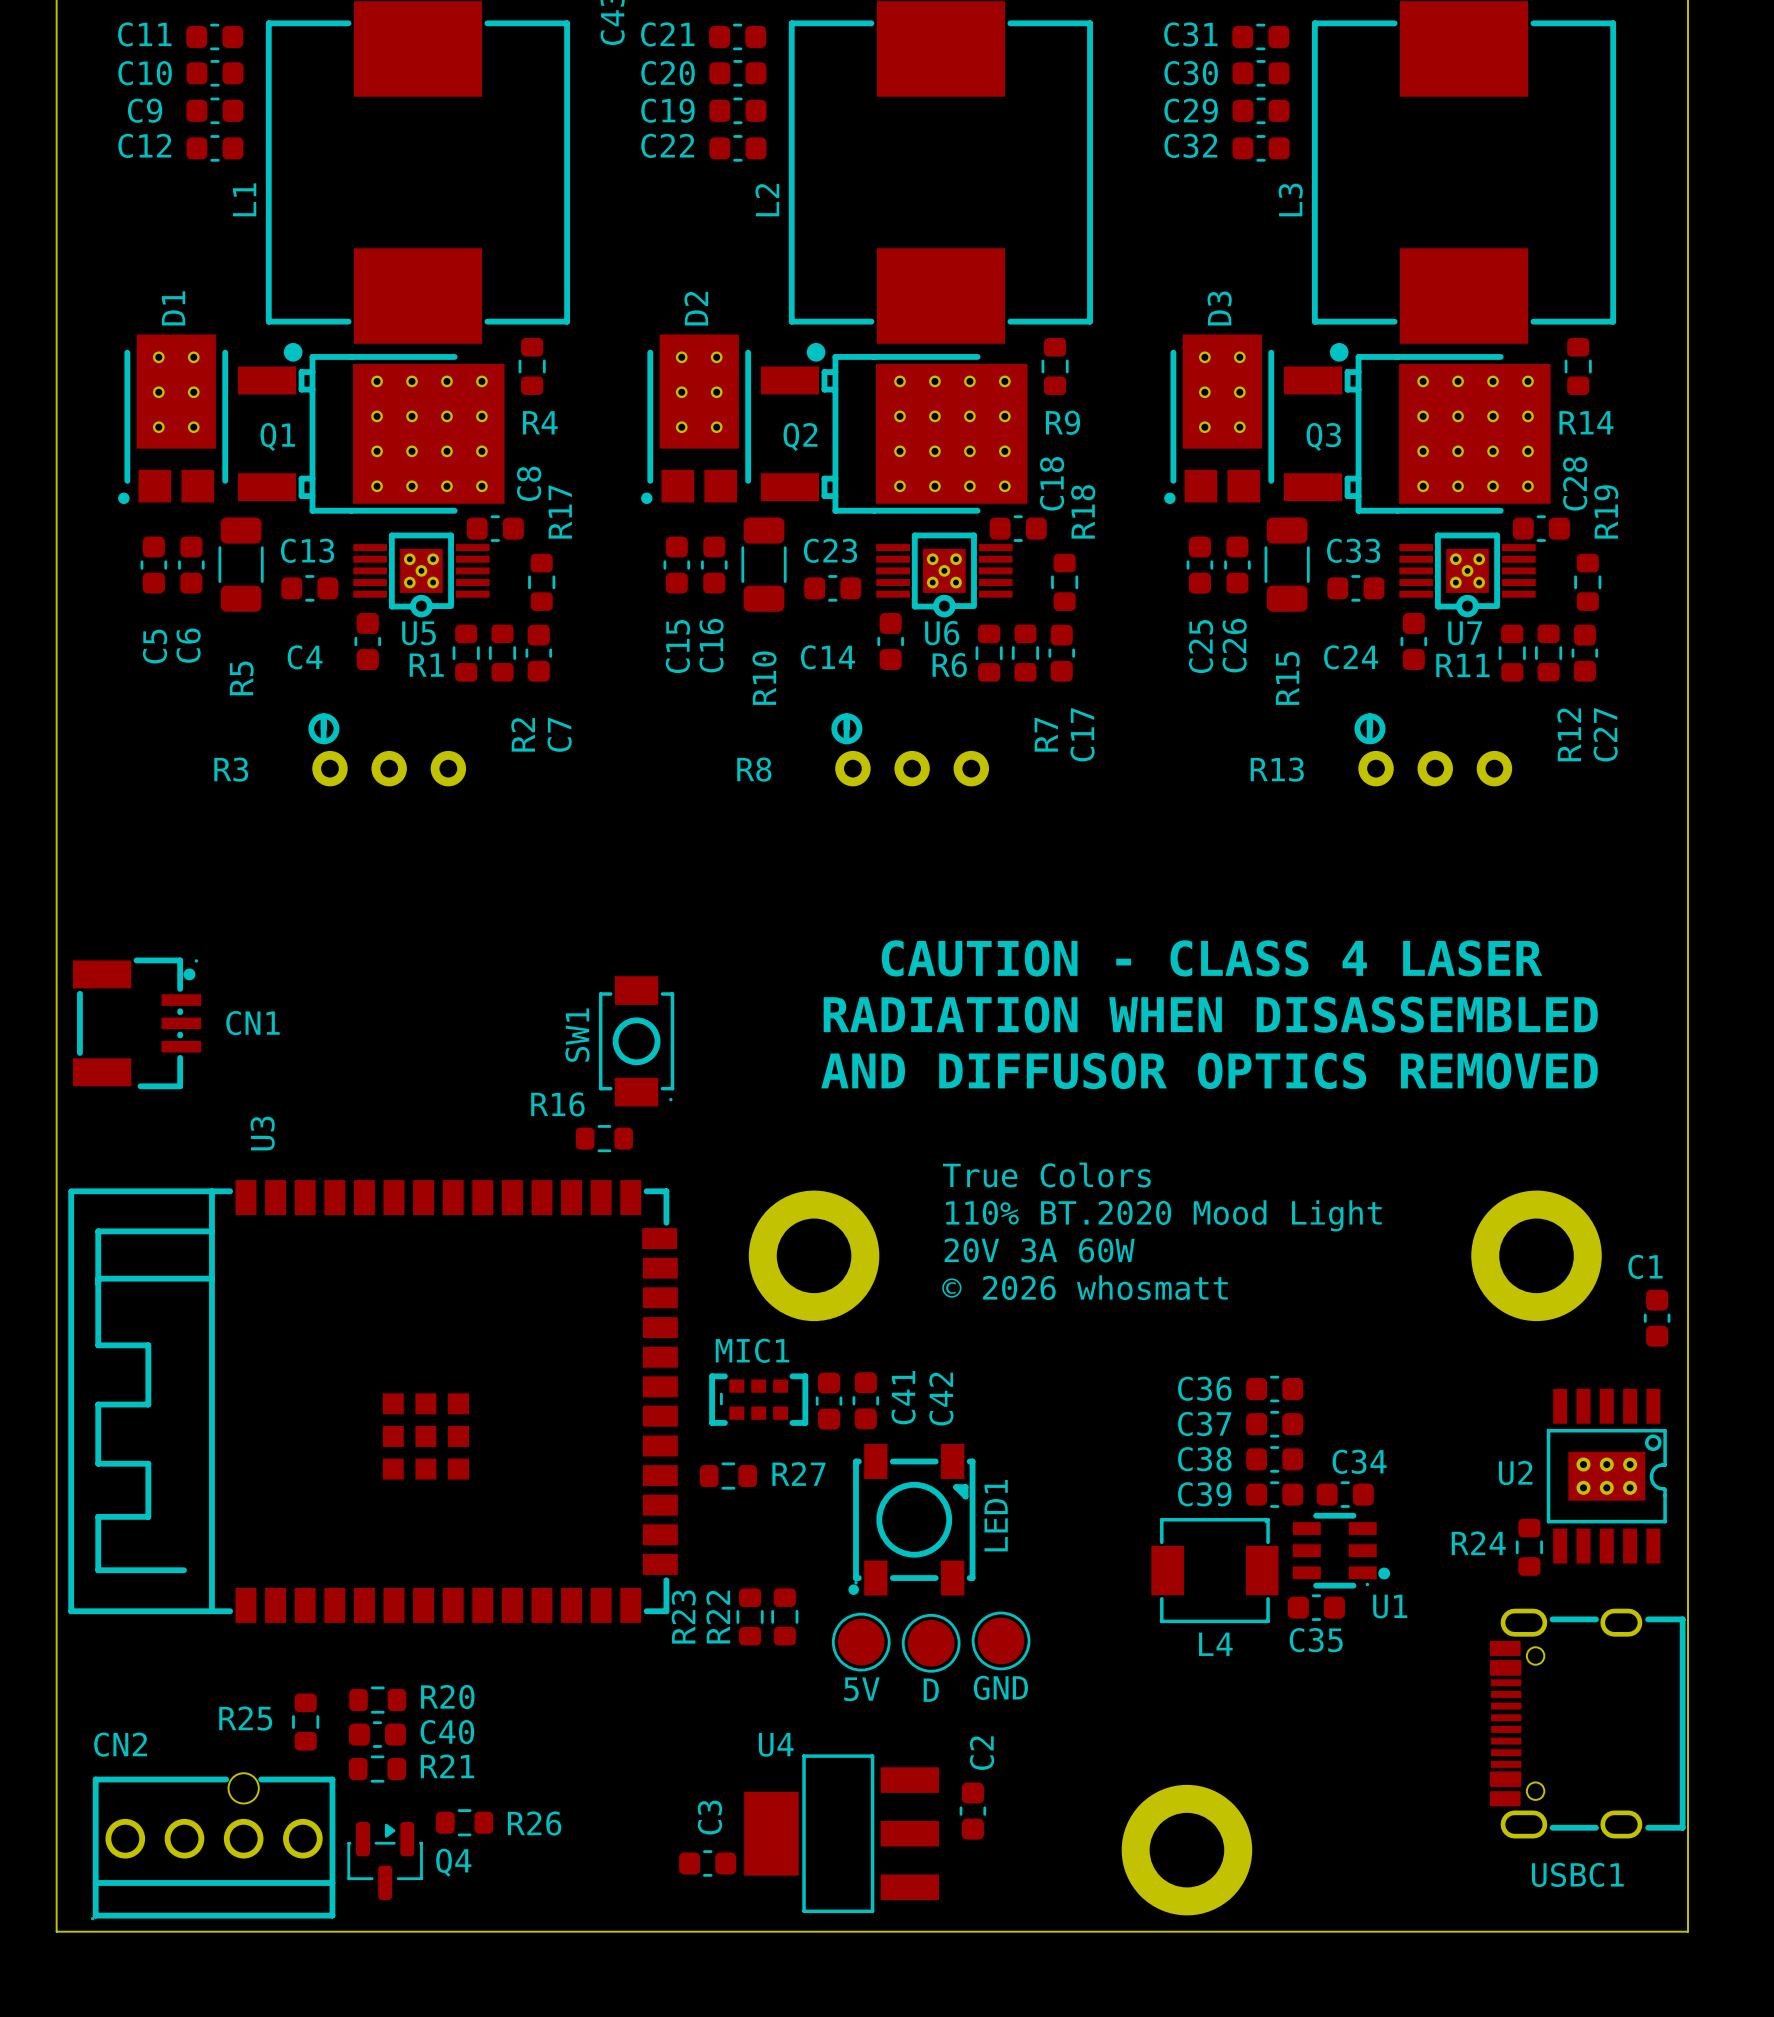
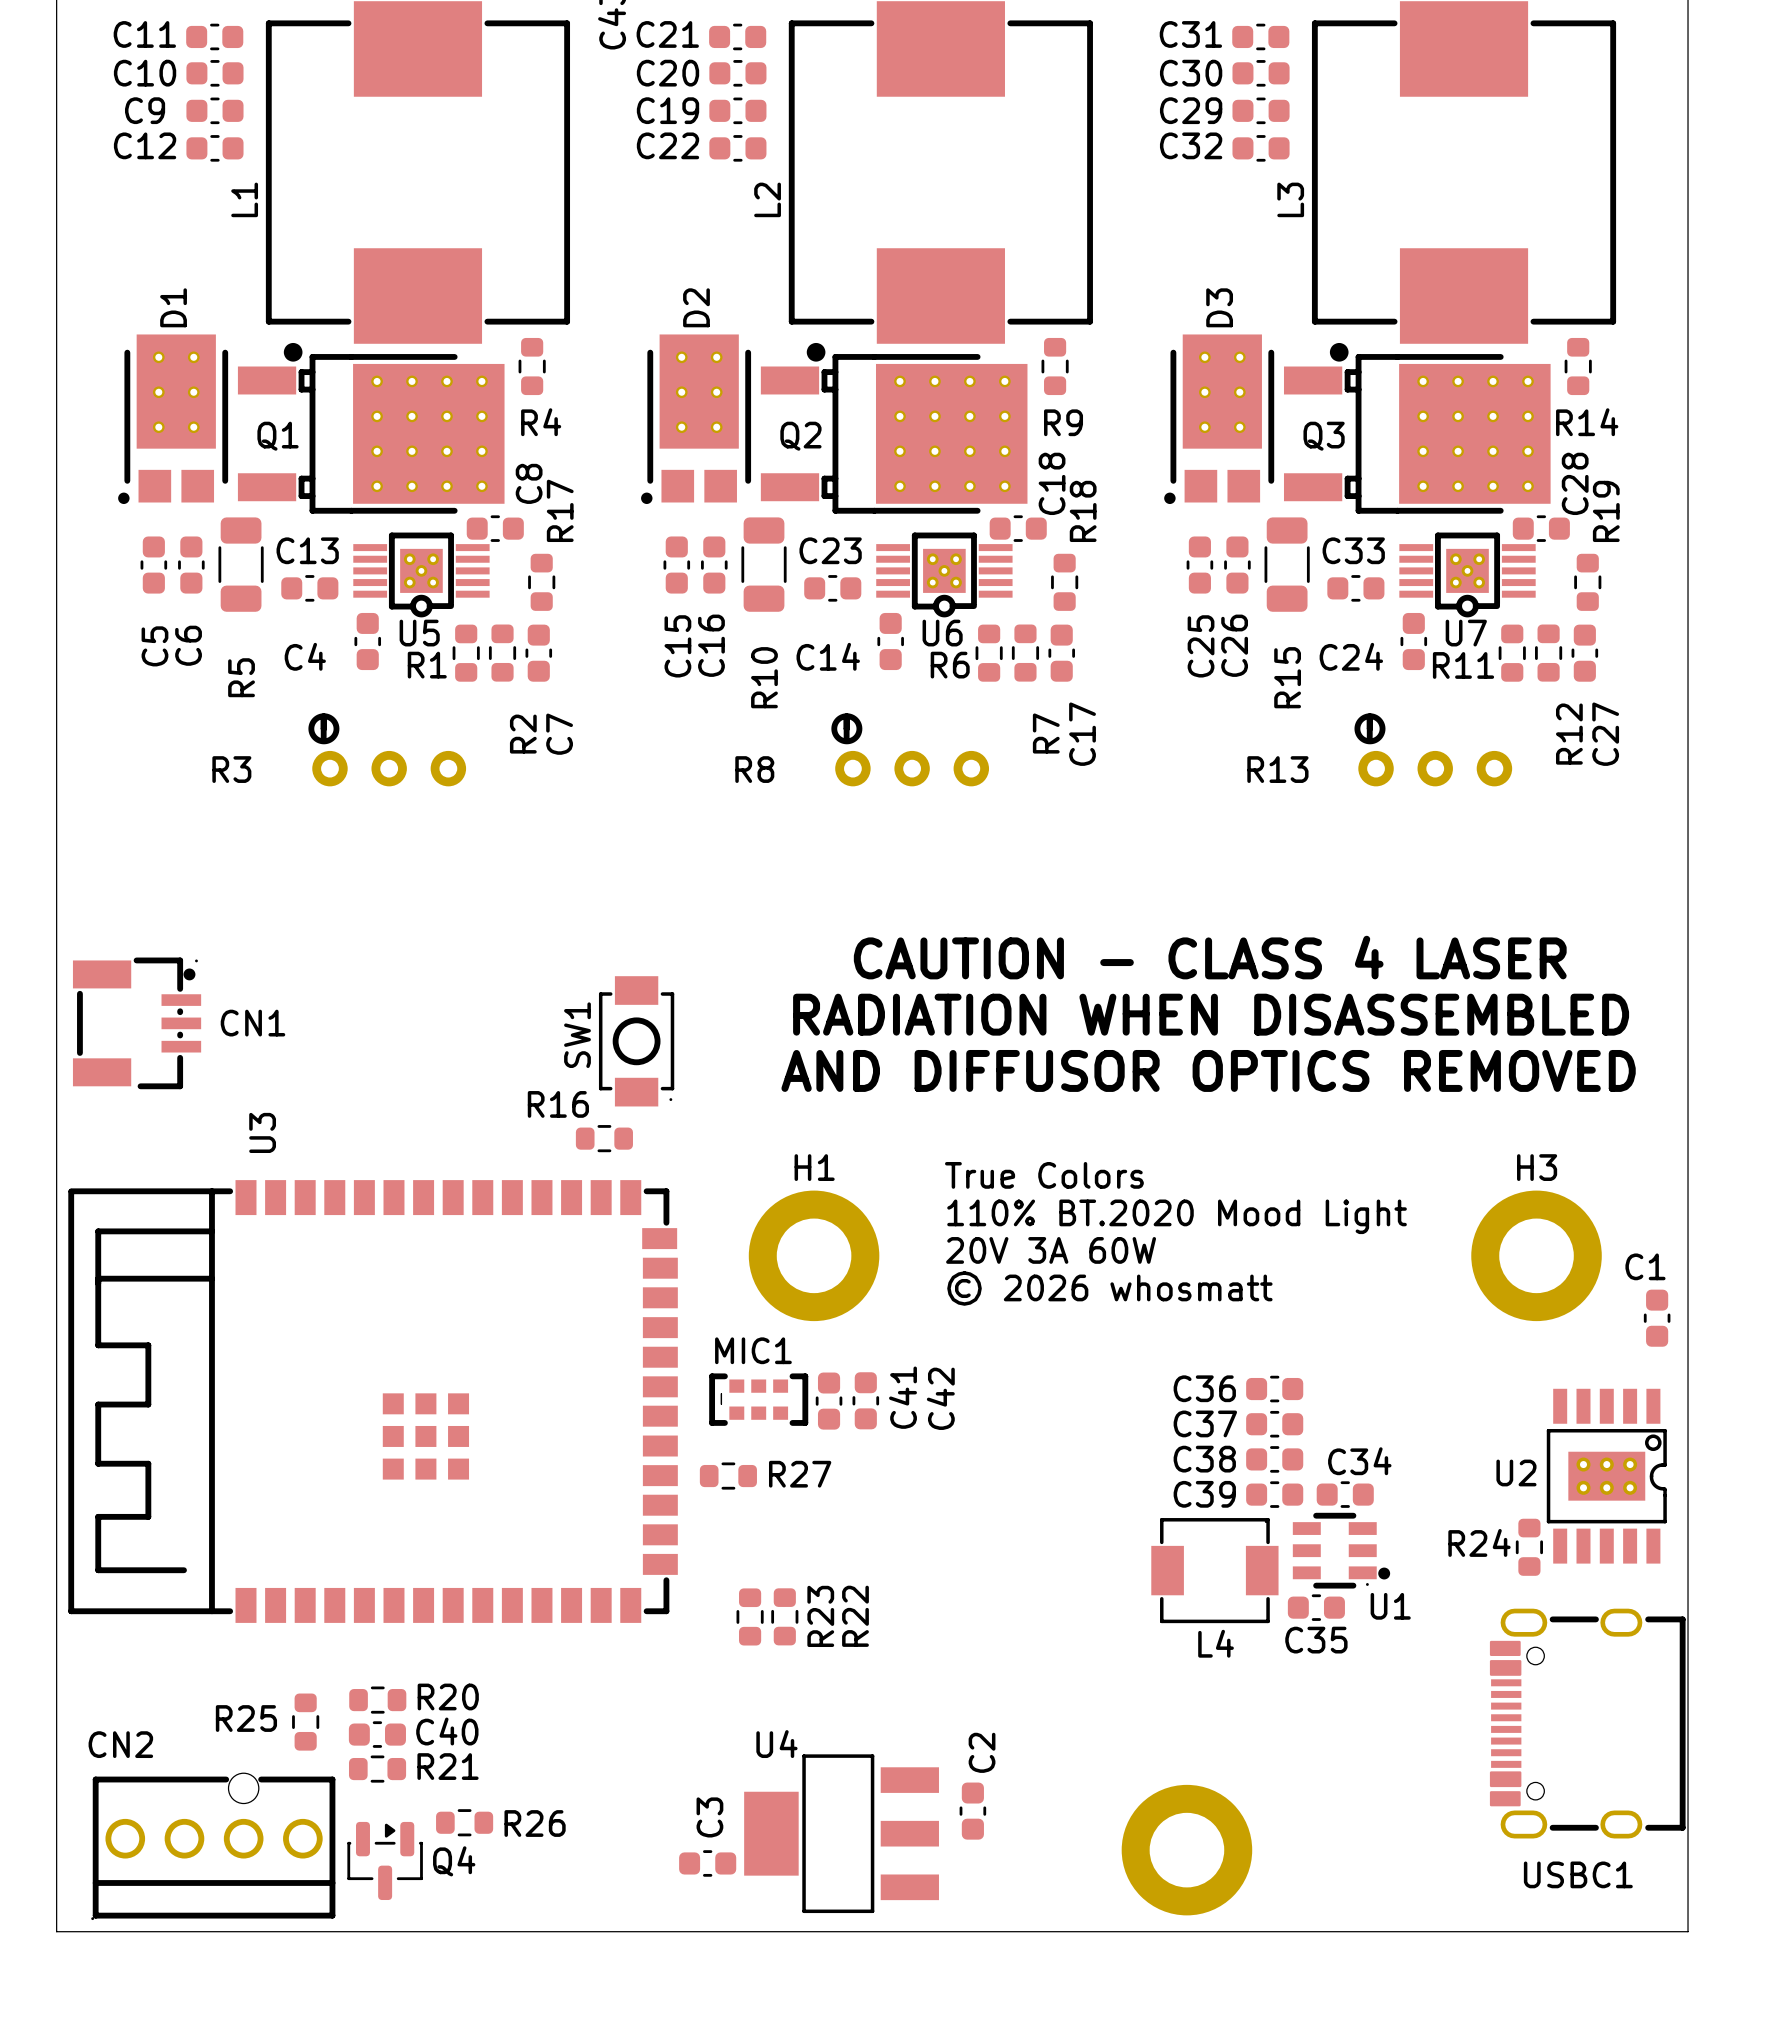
H1 name: none -> H1 (814, 1167)
H3 name: none -> H3 (1537, 1167)
LED1: (911, 1519) -> none
R23 name position: R23 (683, 1617) -> R23 (820, 1616)
R22 name position: R22 (718, 1617) -> R22 (855, 1616)
part: GND (1001, 1640) -> none
part: 5V (861, 1642) -> none
part: D (931, 1643) -> none

